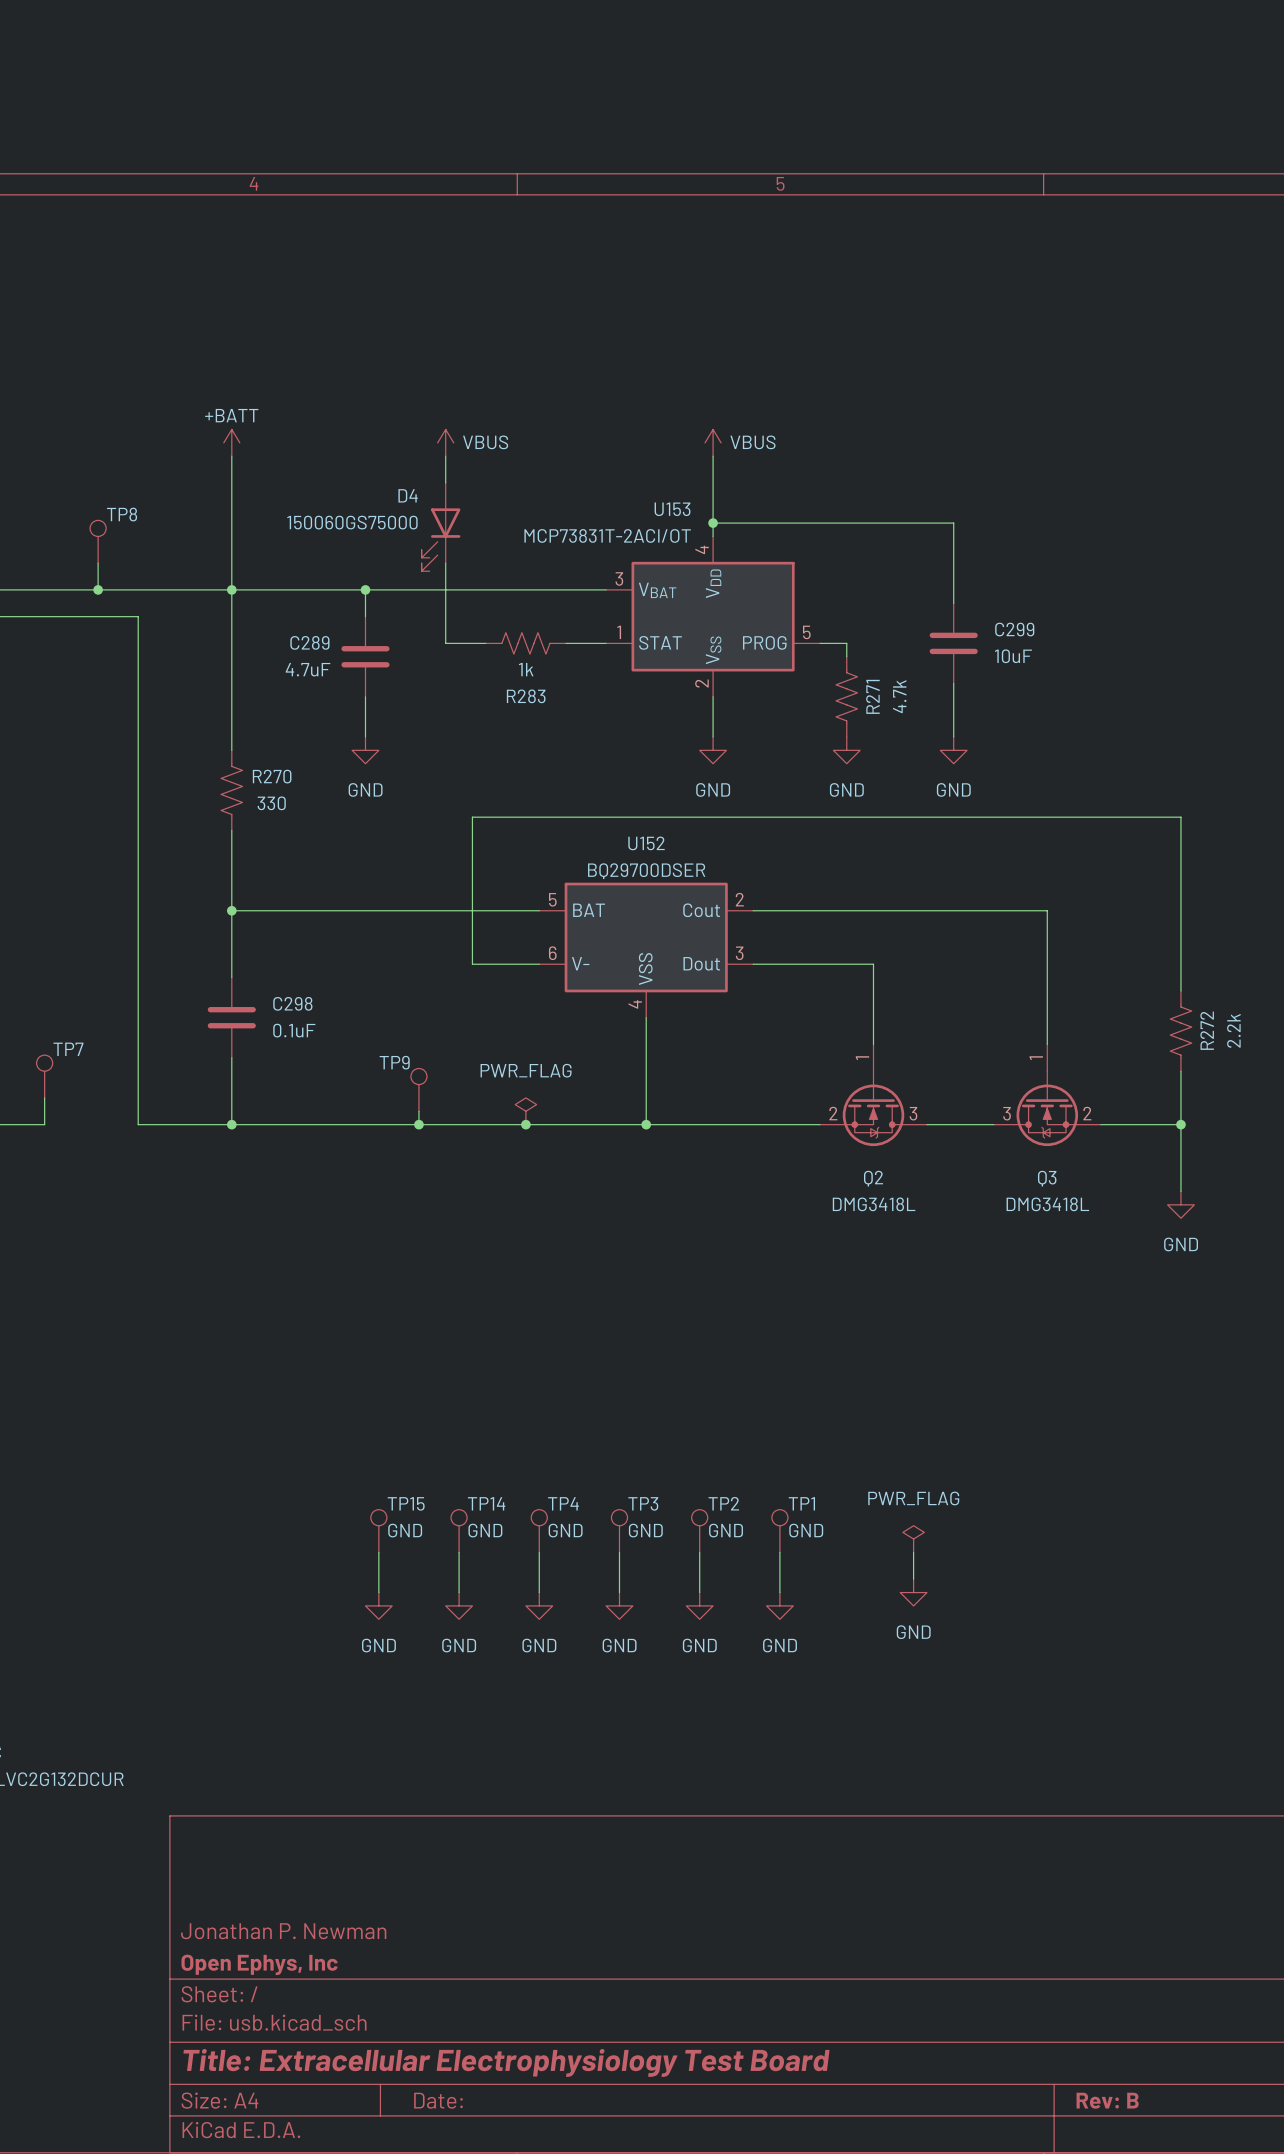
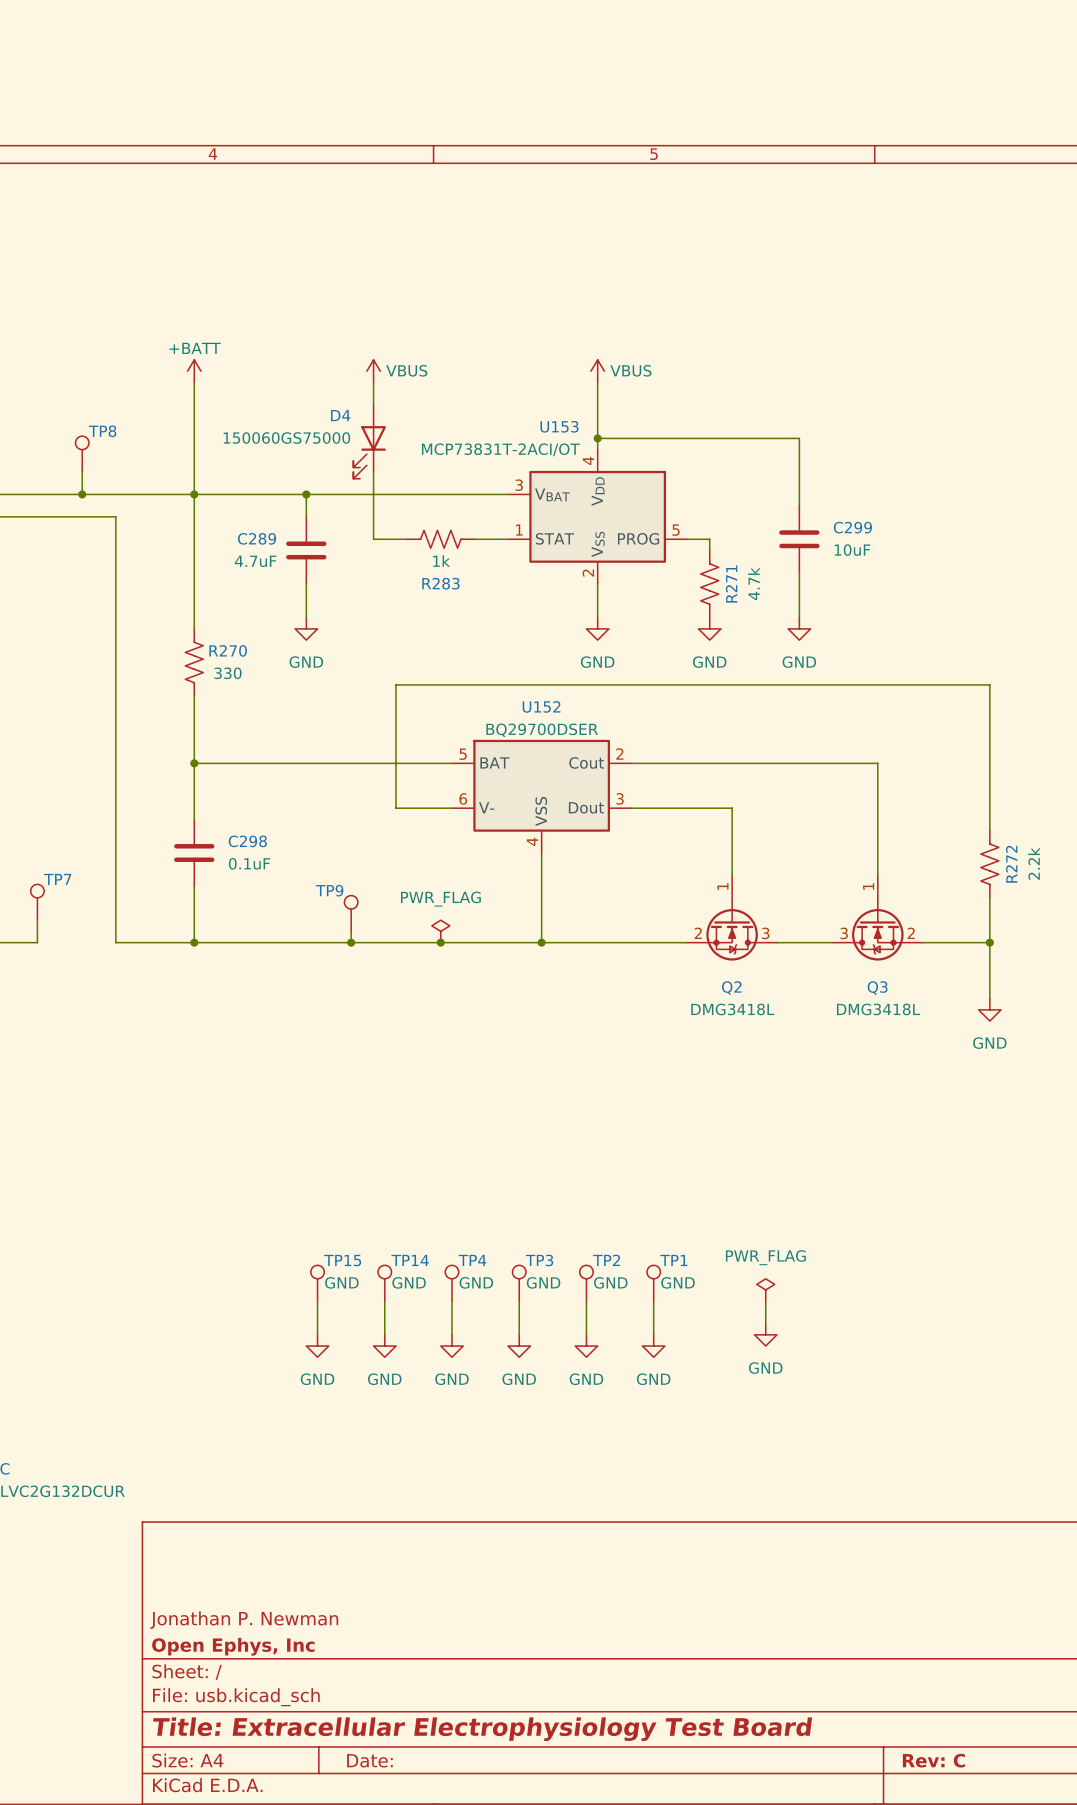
title block: Rev: B (1107, 2100) -> Rev: C (933, 1760)

